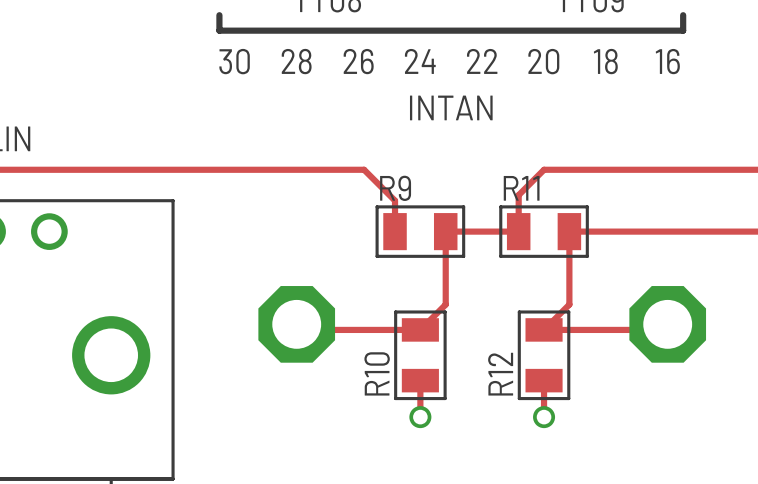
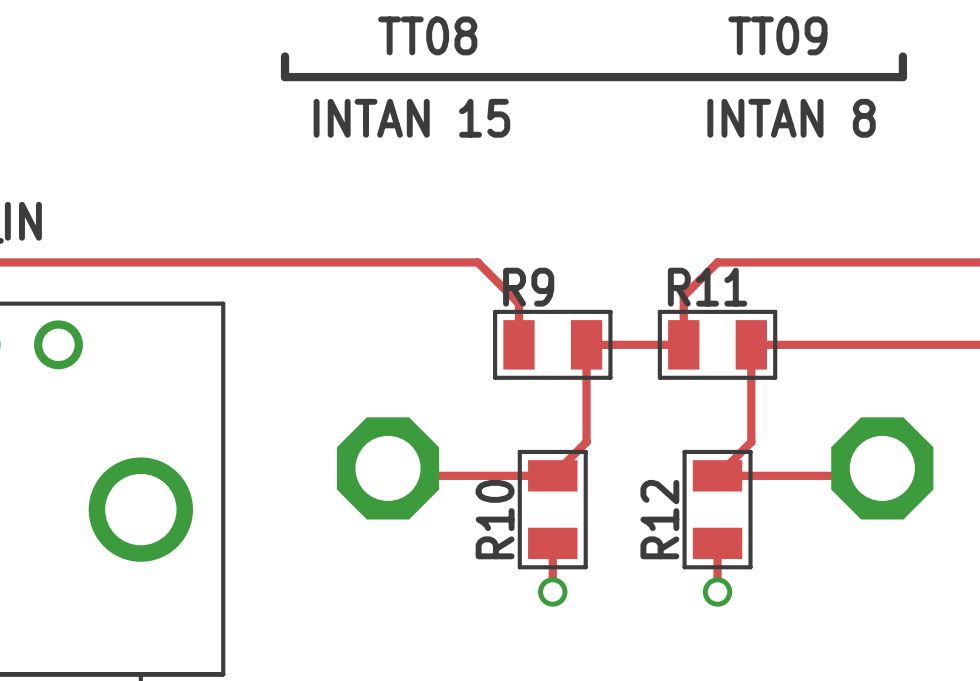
text: 30 (234, 61) -> INTAN 15 (411, 118)
text: 28 (296, 61) -> none
text: 26 (358, 61) -> none
text: 24 (420, 61) -> none
text: 22 (482, 61) -> none
text: 20 (543, 61) -> none
text: 18 (605, 61) -> none
text: 16 (667, 61) -> INTAN 8 (791, 118)
text: INTAN (451, 107) -> none

